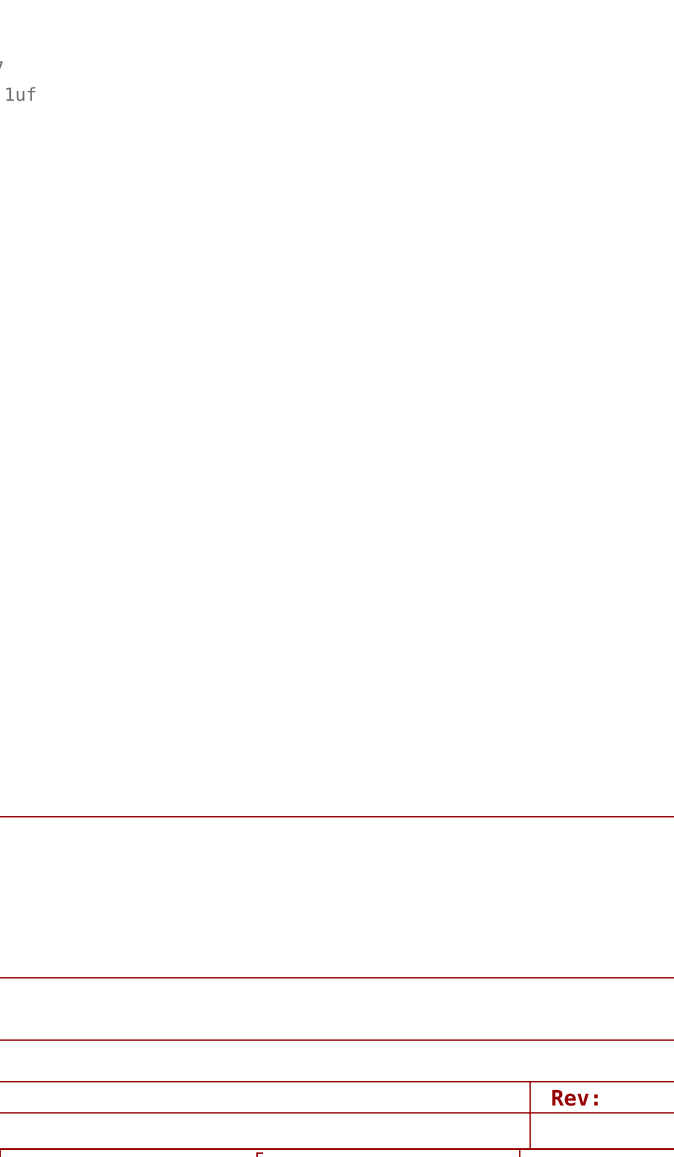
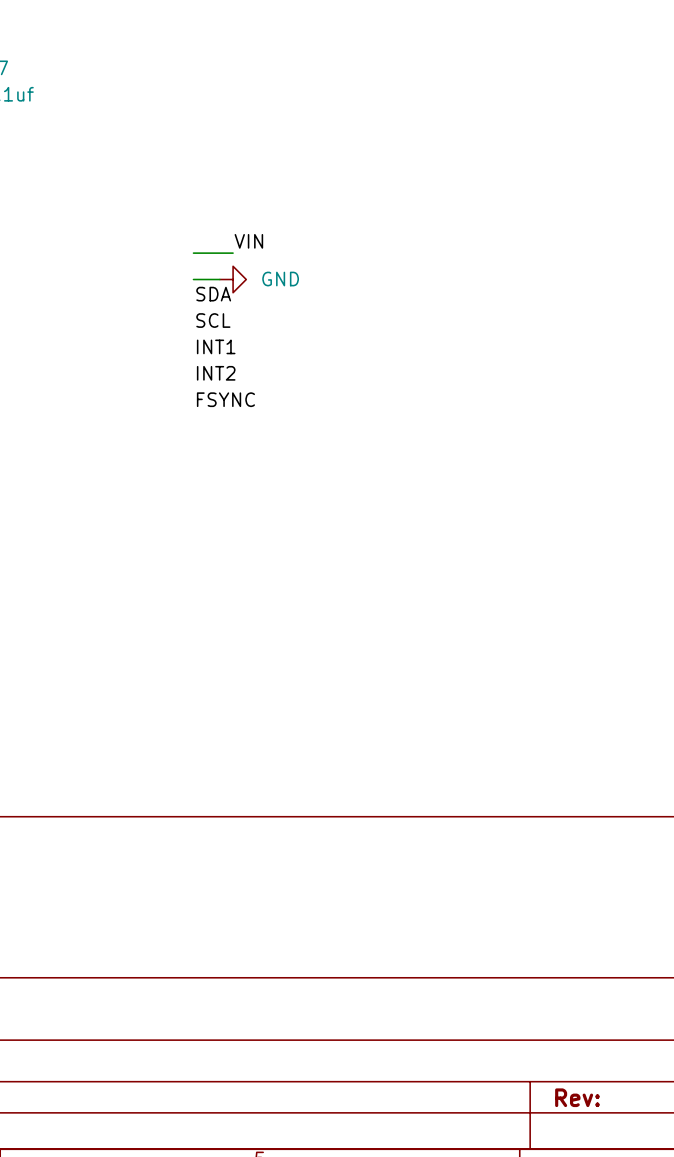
label: none -> VIN (248, 241)
wire: none -> (193, 253) (233, 253)
wire: none -> (193, 279) (219, 279)
power symbol: none -> GND (233, 279)
label: none -> SDA (213, 294)
label: none -> SCL (213, 320)
label: none -> INT1 (216, 346)
label: none -> INT2 (216, 373)
label: none -> FSYNC (225, 399)

